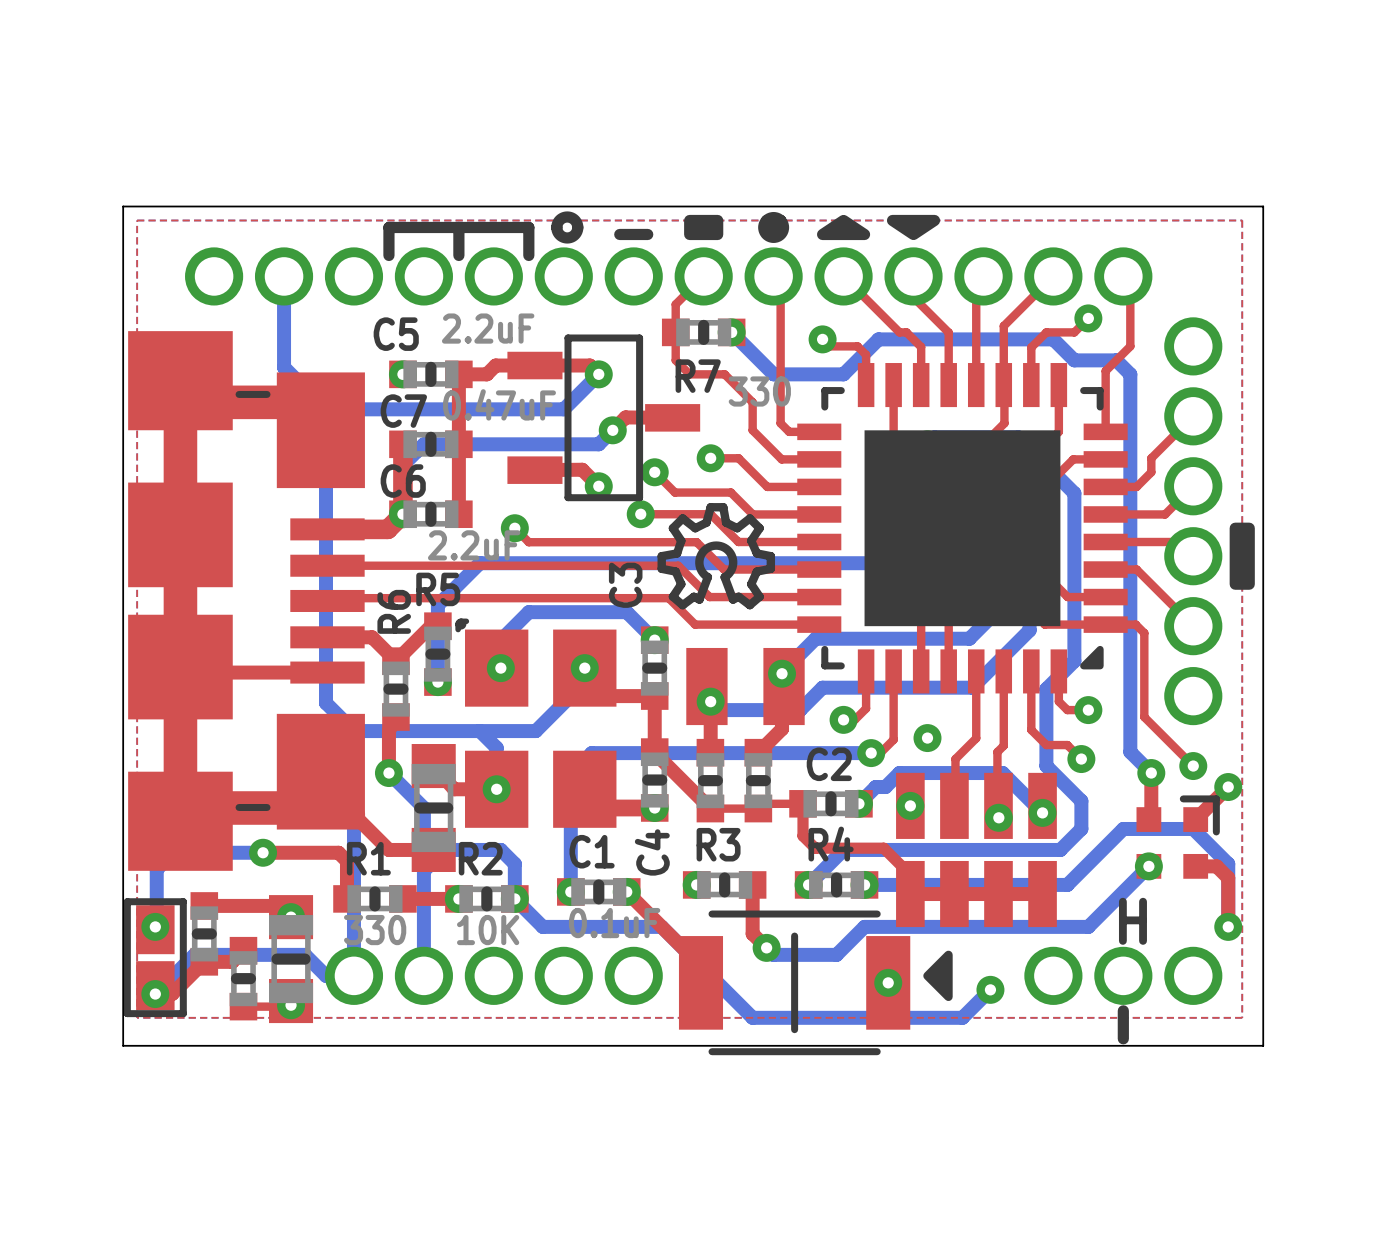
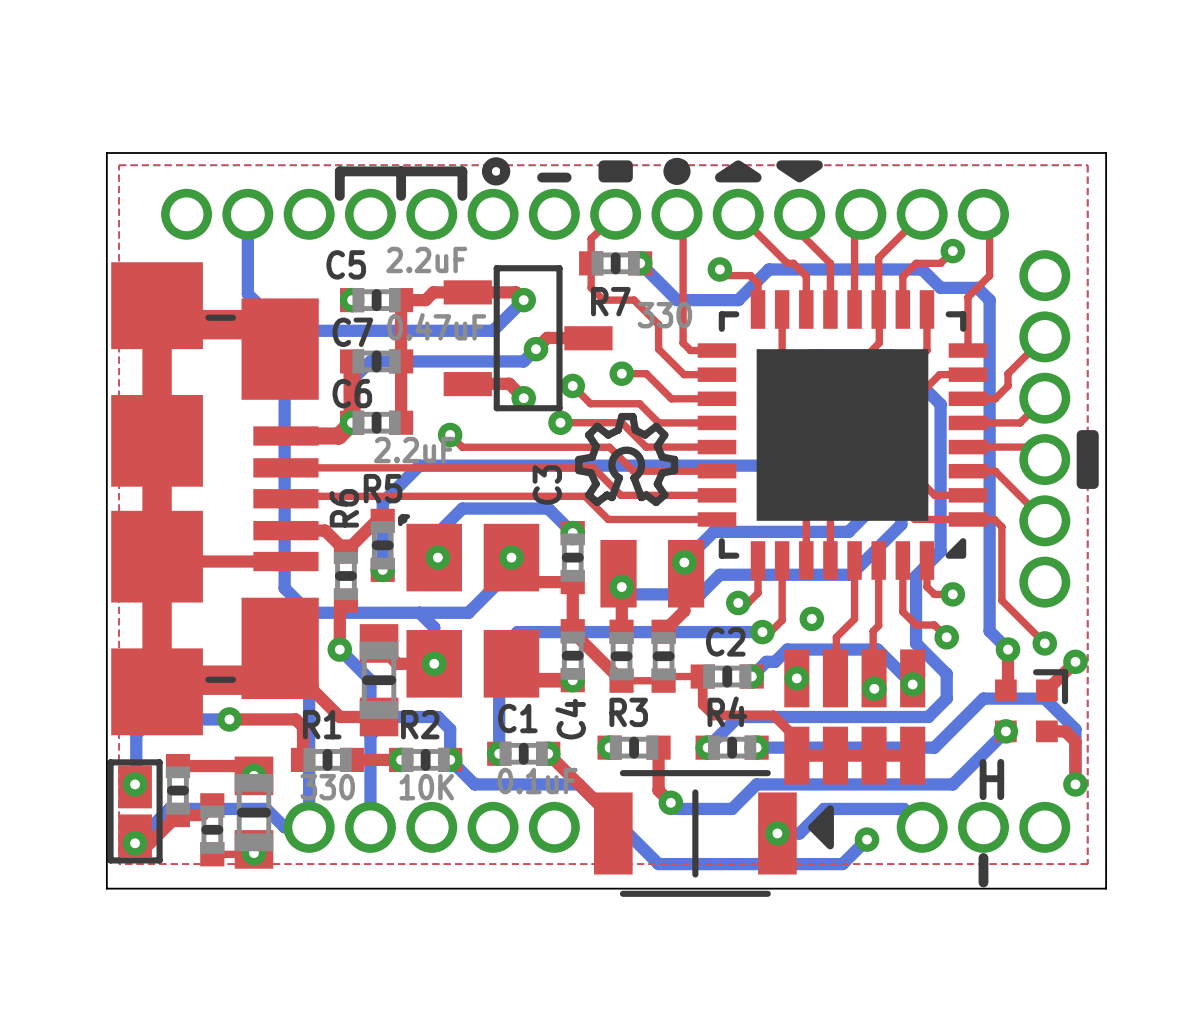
bottom track: none -> (922, 827) (903, 808) (824, 808) (799, 833) (777, 833)

